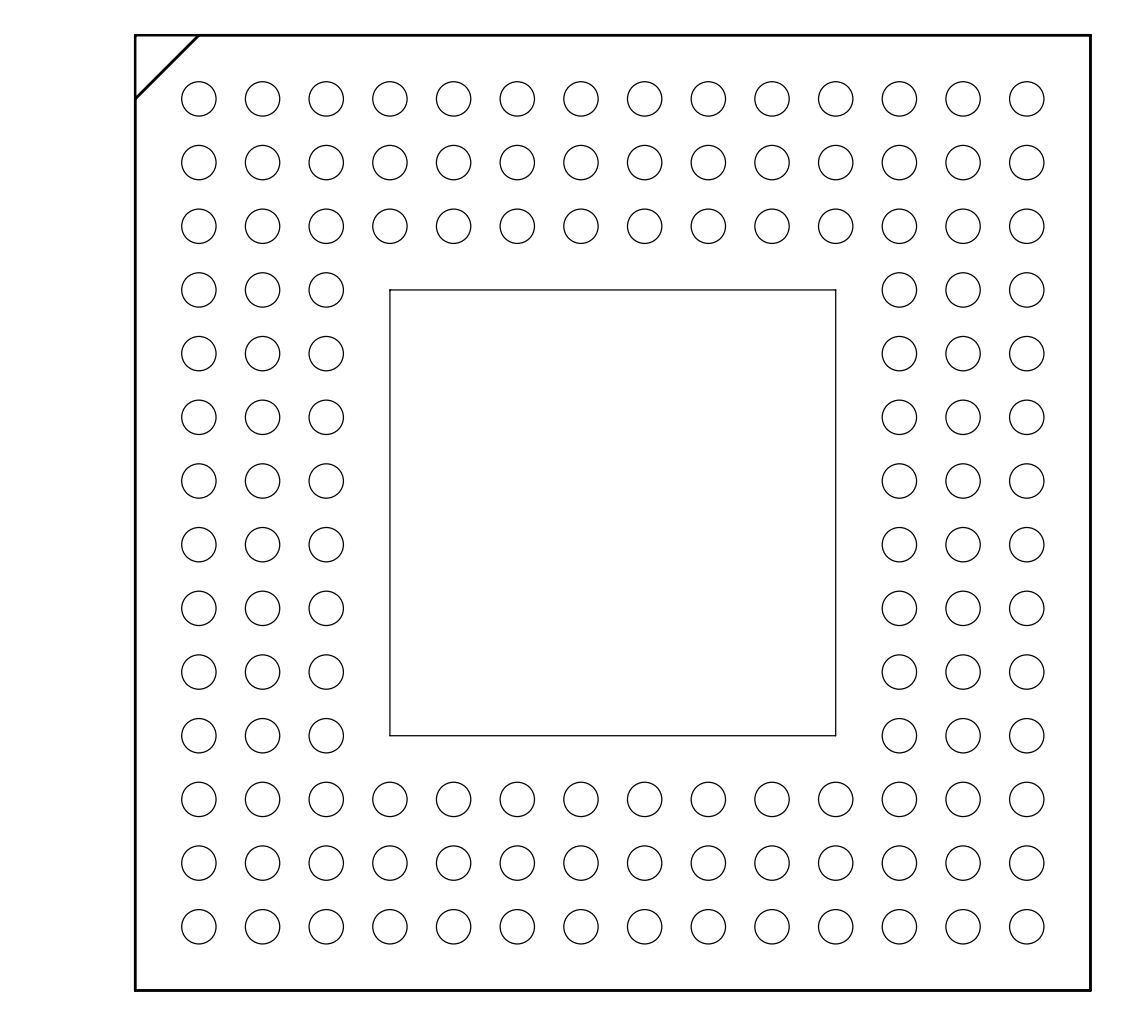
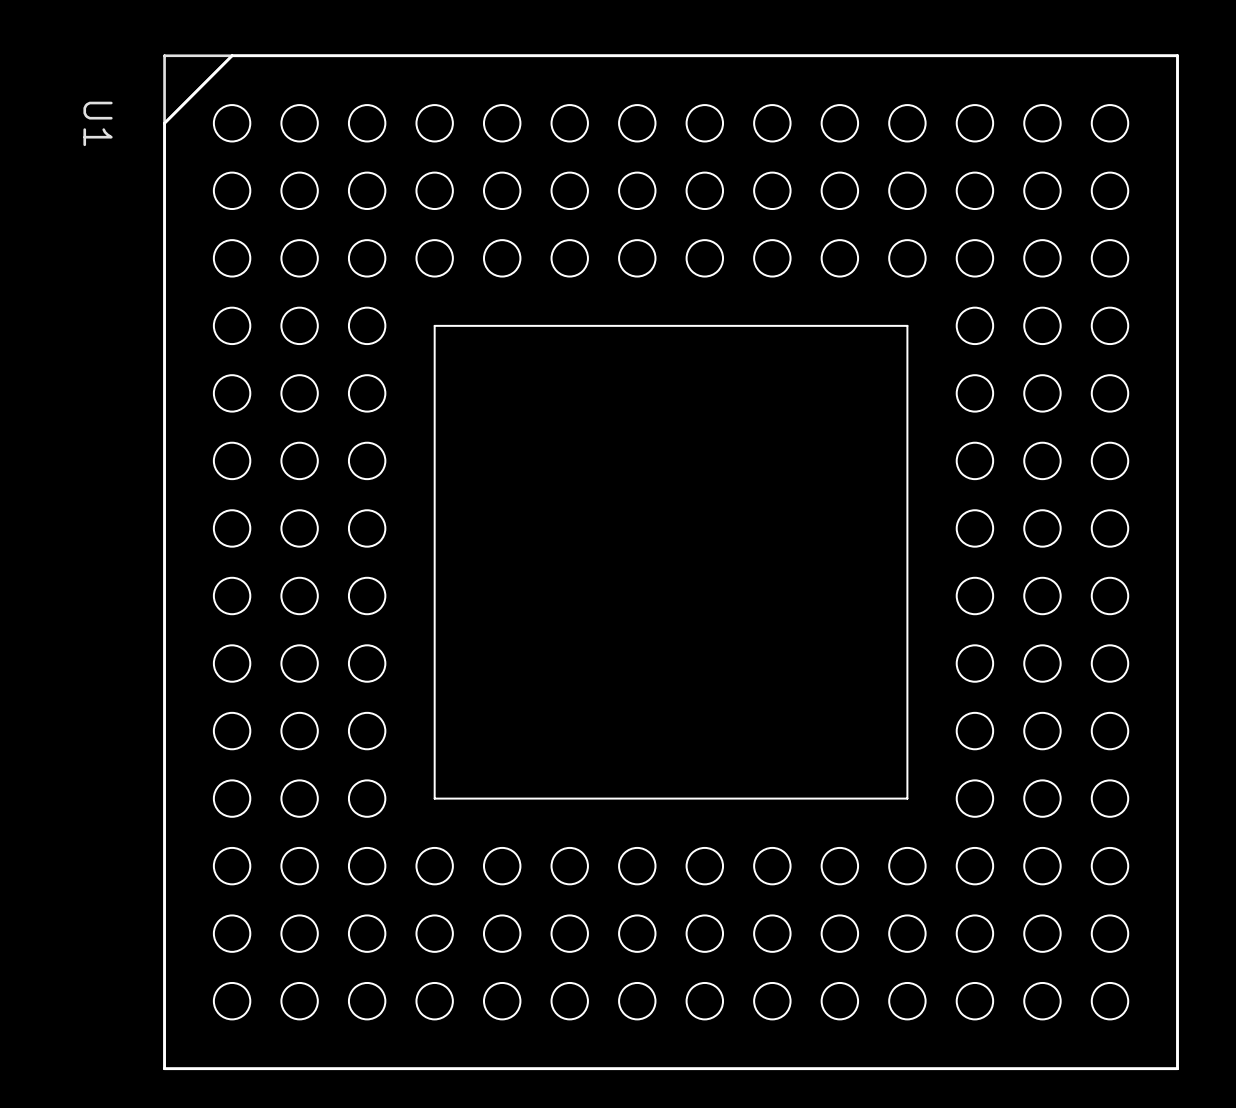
U1: none -> (671, 562)

